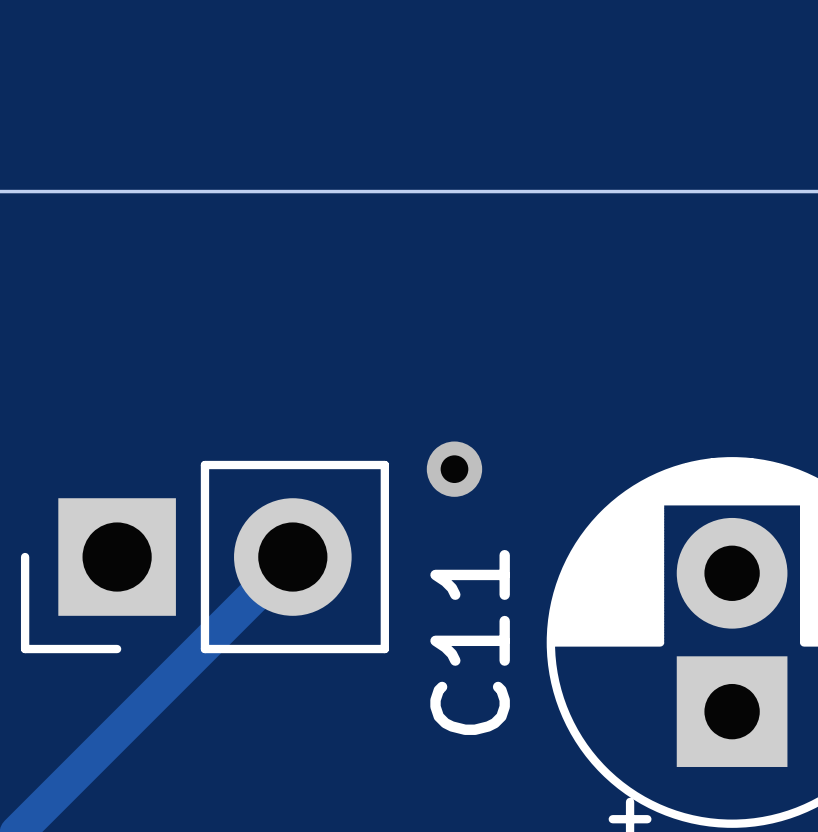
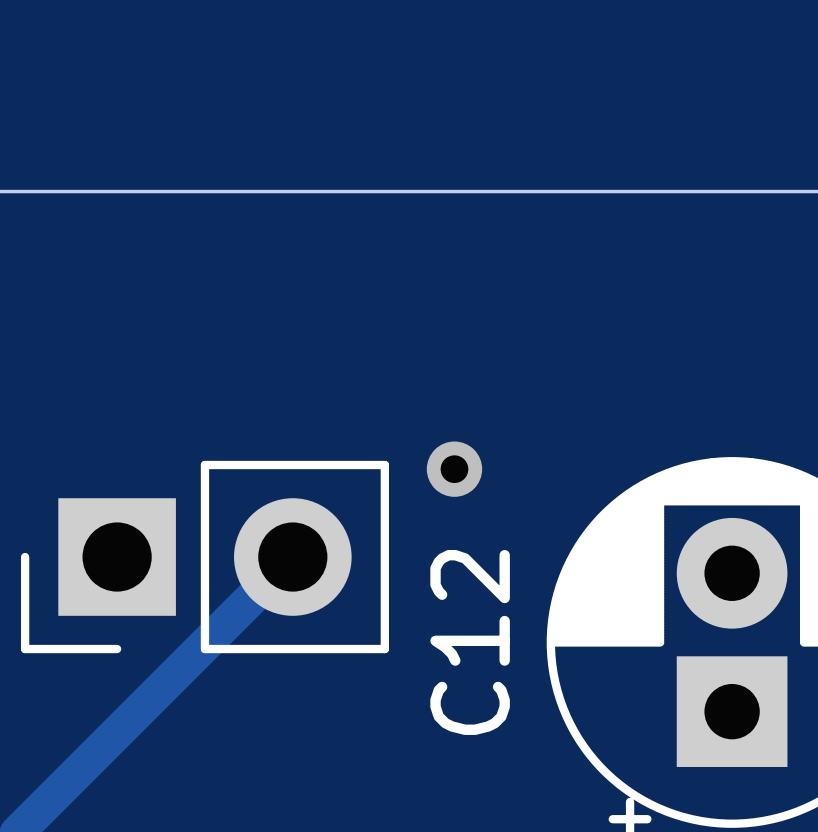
C11 name: C11 (470, 642) -> C12 (470, 642)

